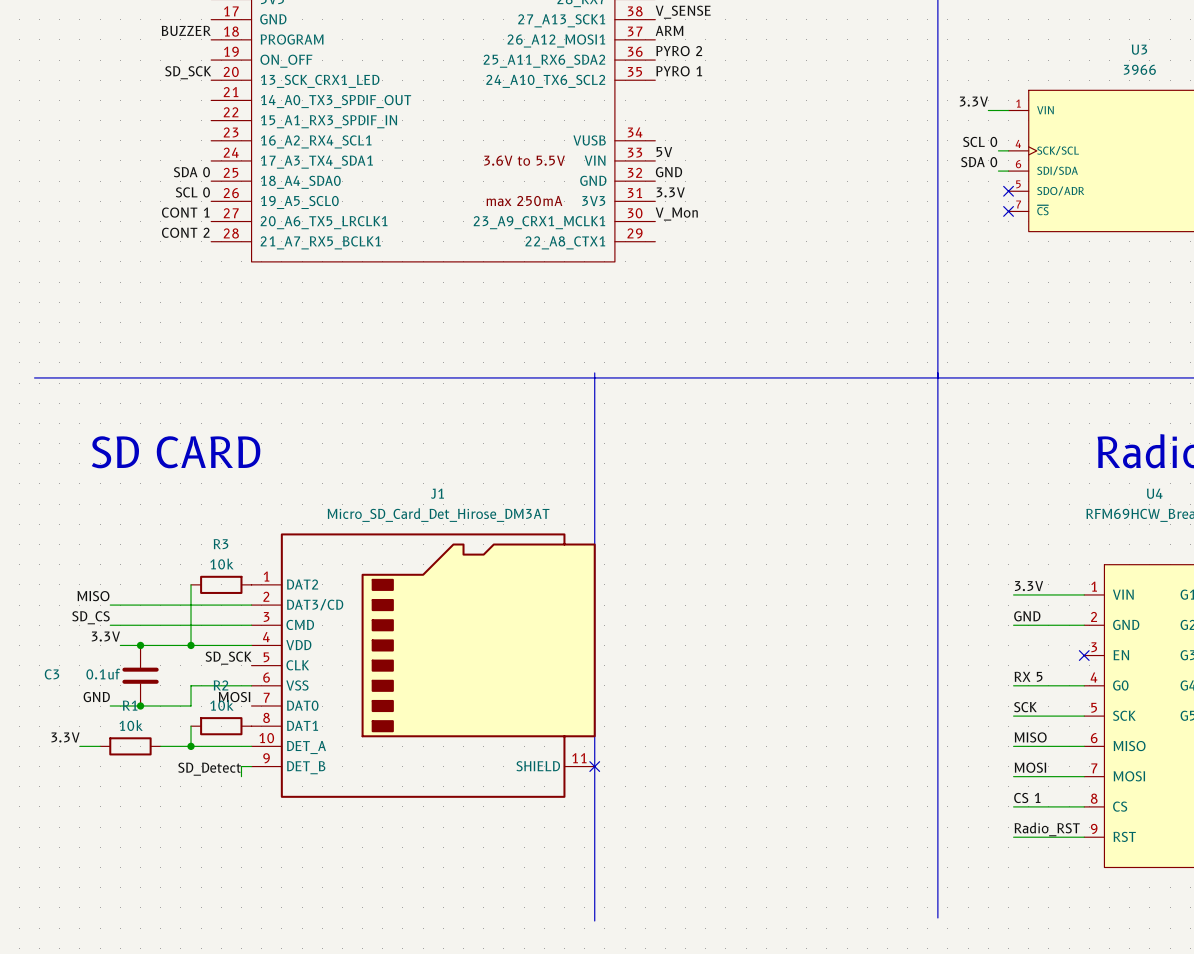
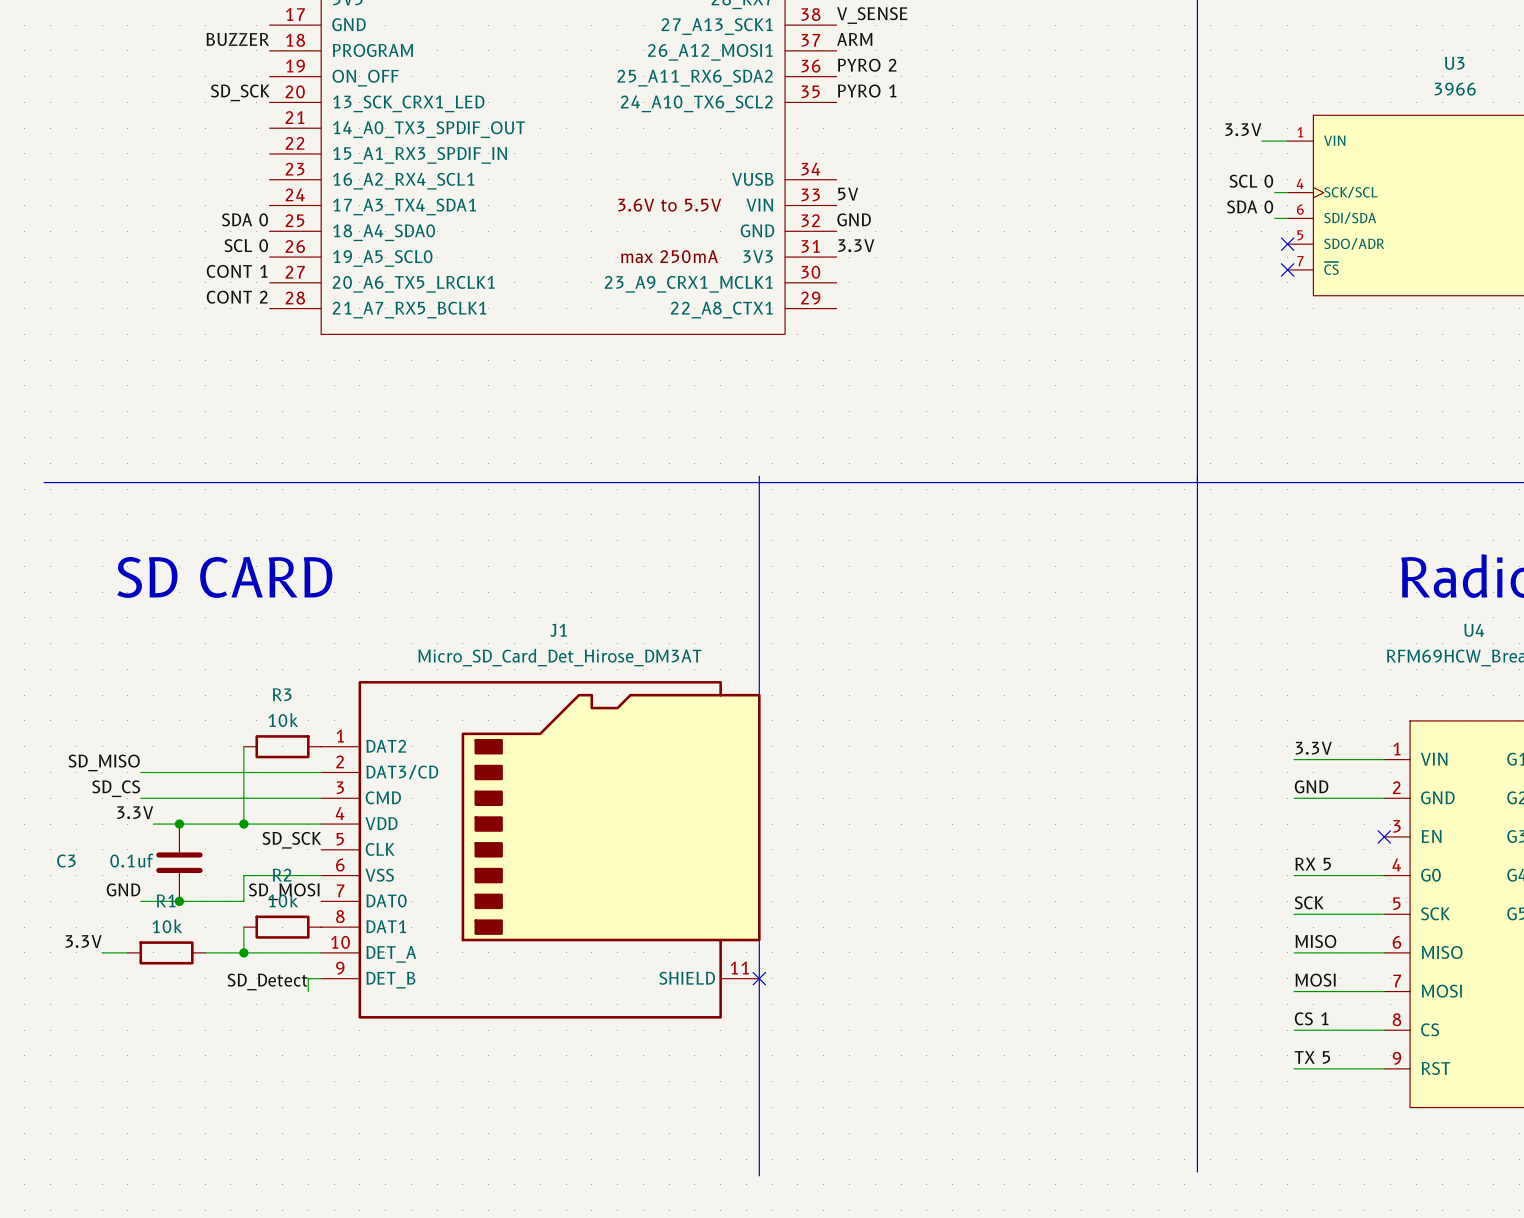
label: V_Mon (676, 214) -> none
label: MISO (93, 596) -> SD_MISO (104, 762)
label: MOSI (234, 697) -> SD_MOSI (284, 891)
label: Radio_RST (1047, 829) -> TX 5 (1312, 1057)

